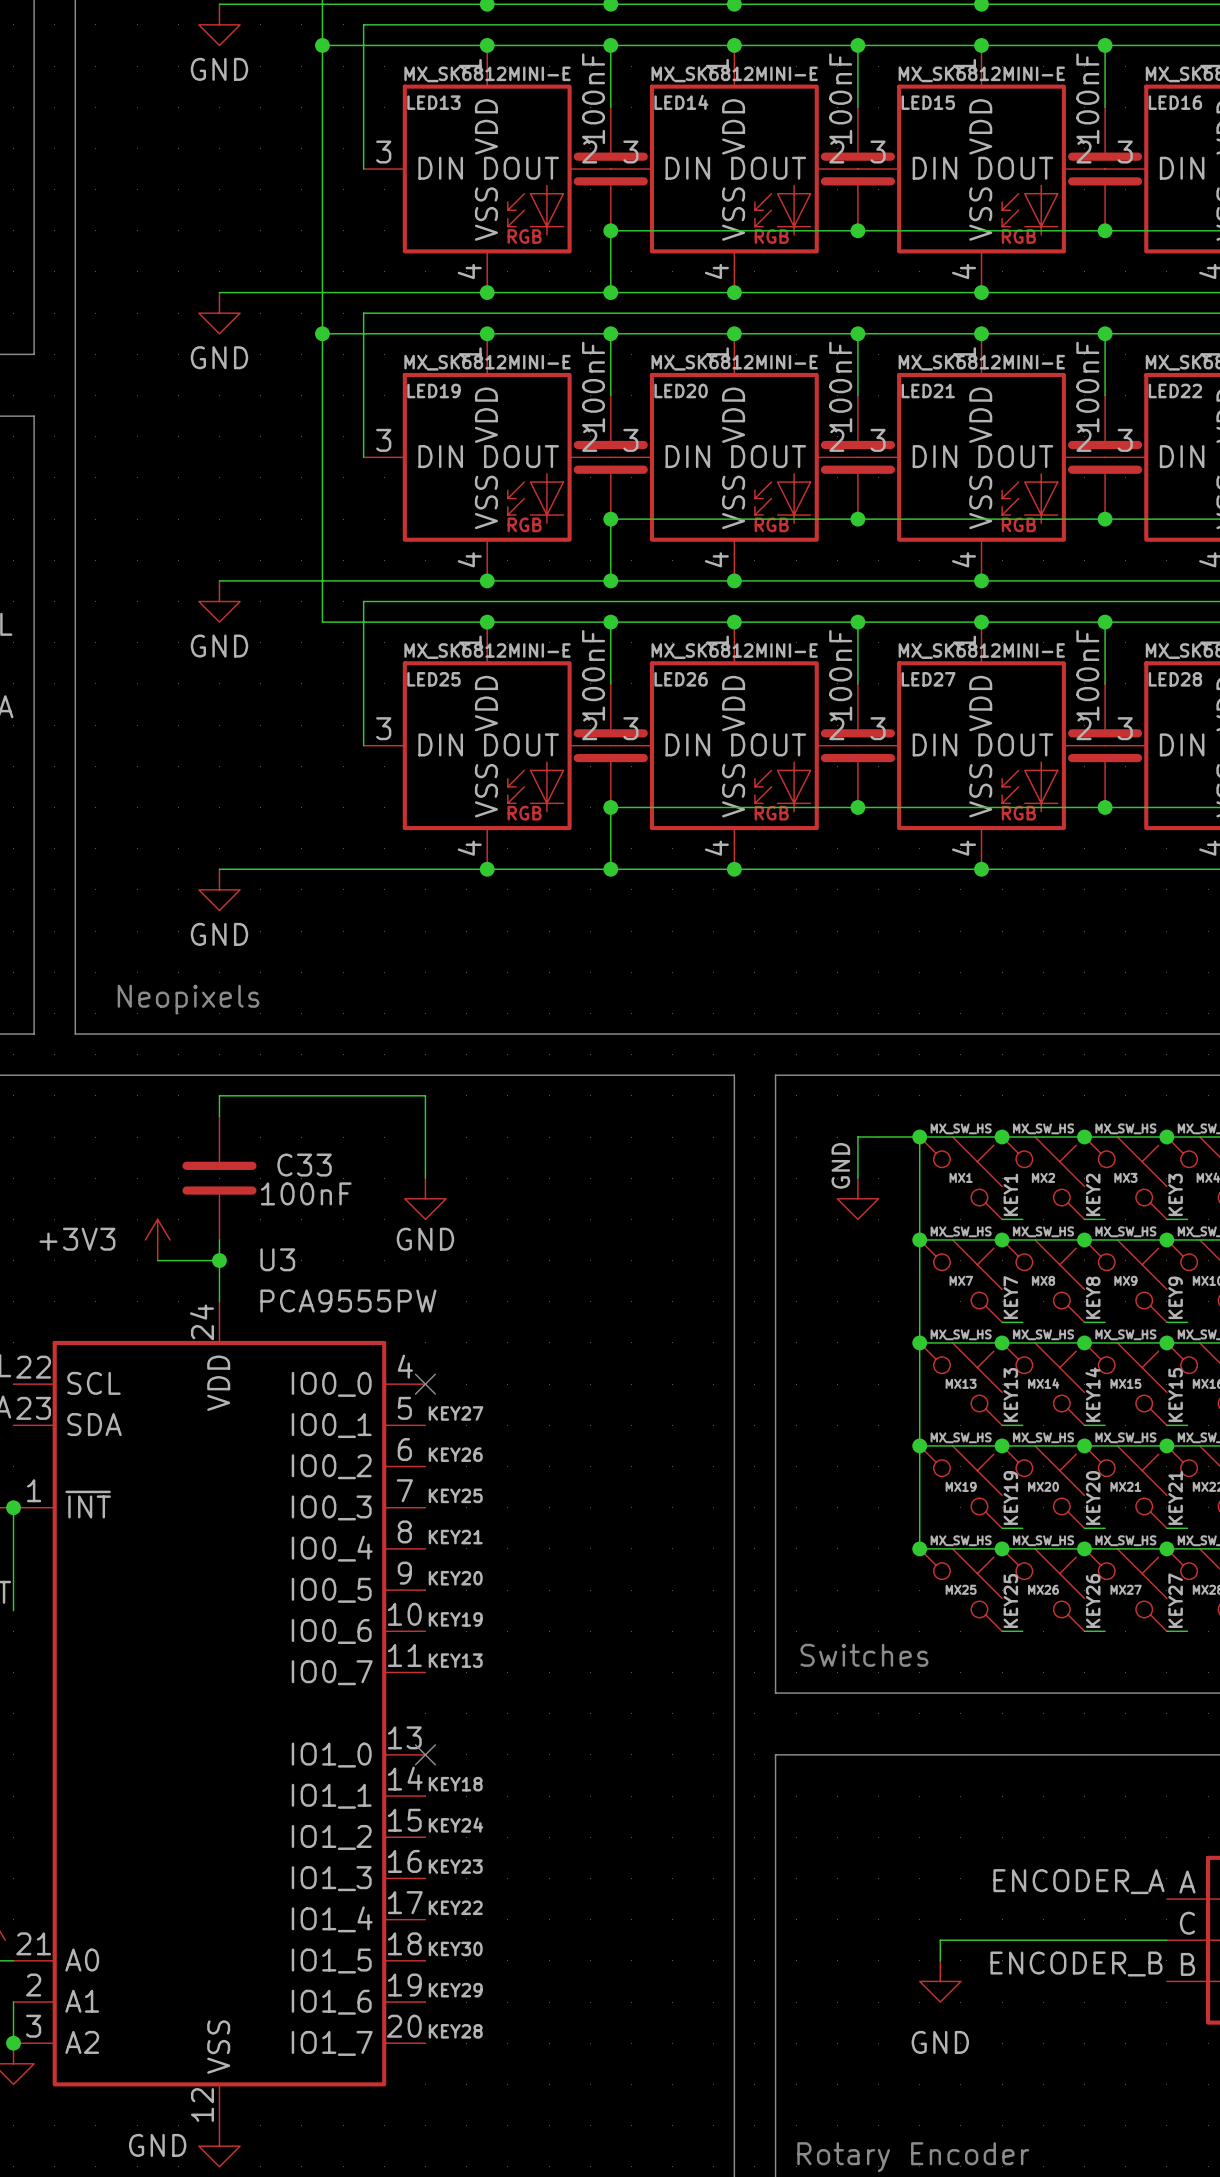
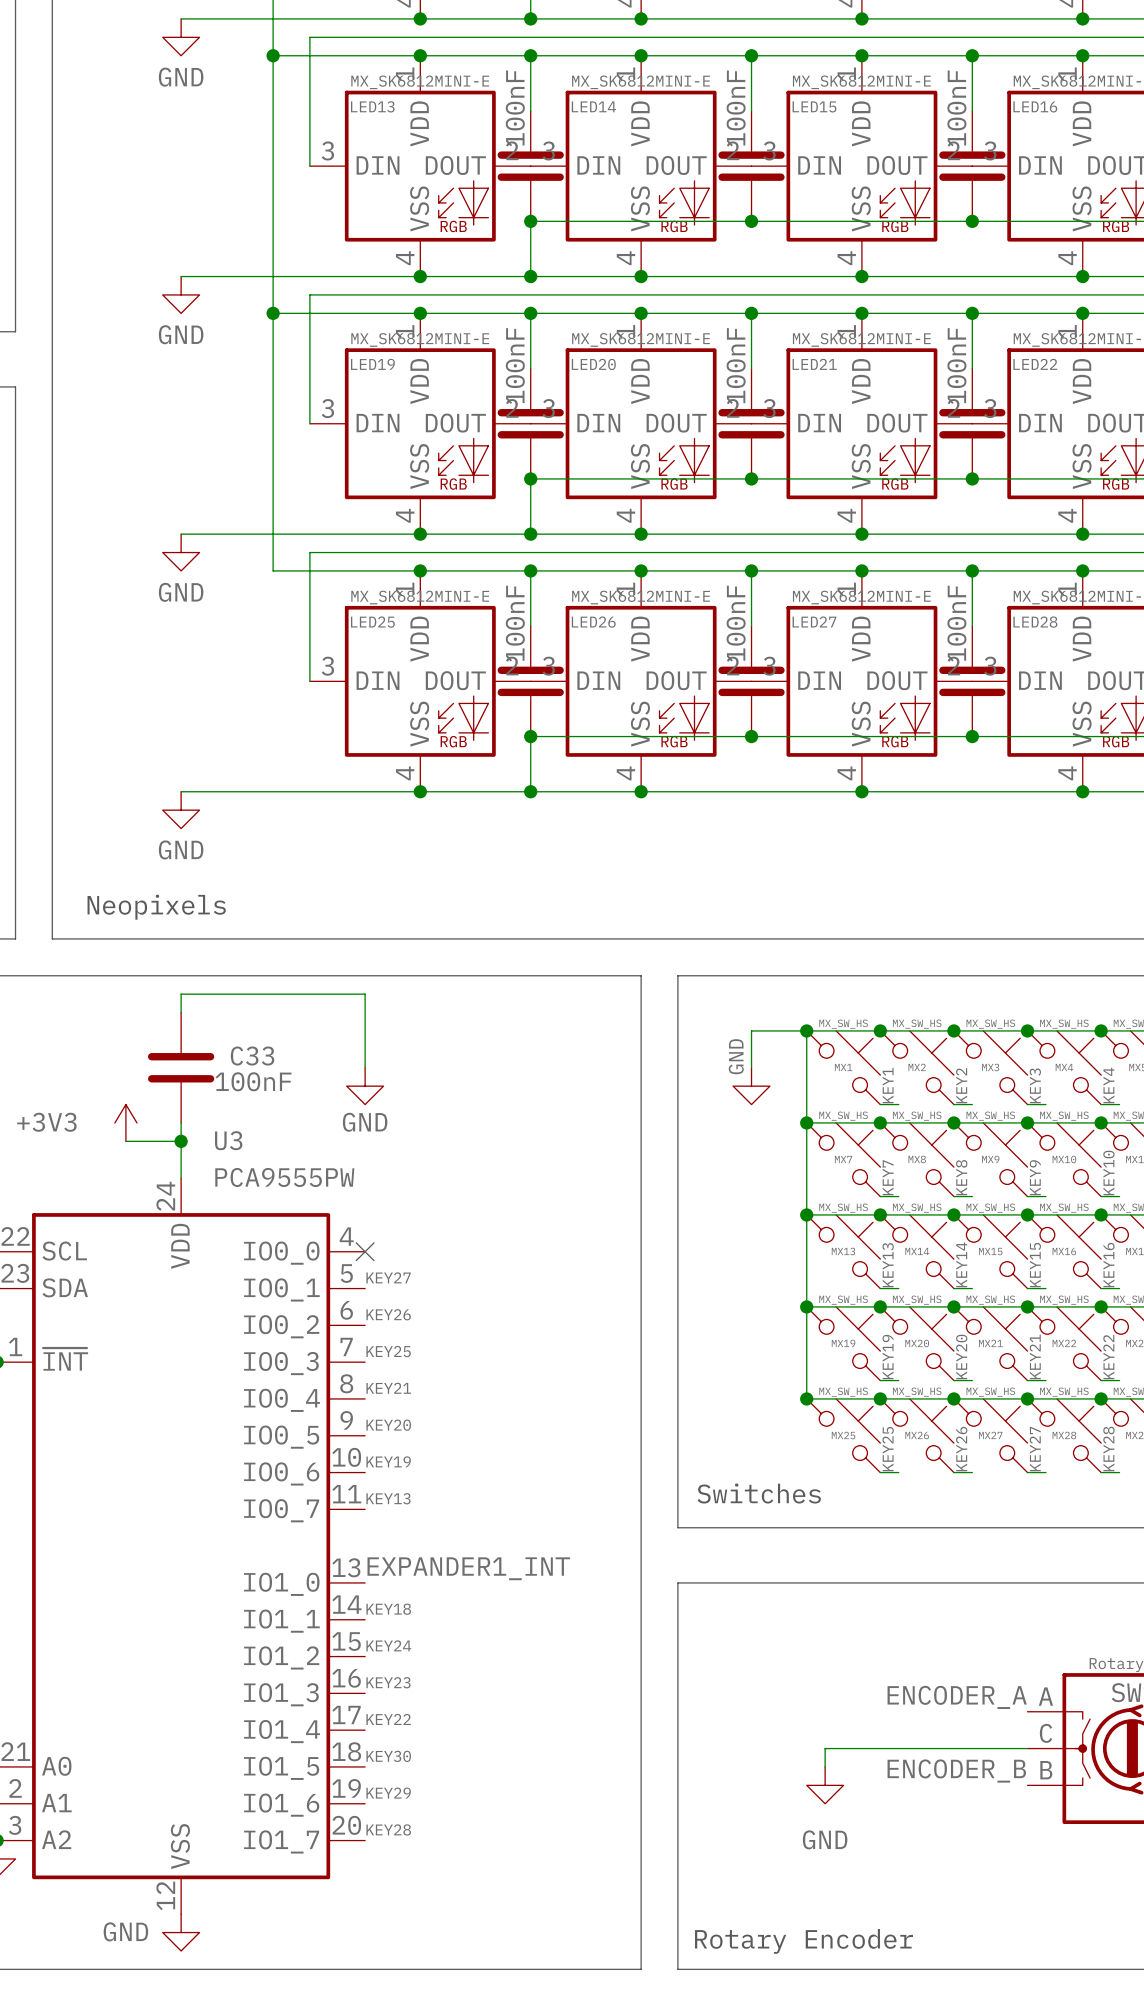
label: none -> EXPANDER1_INT (468, 1568)
no-connect mark: (425, 1754) -> none

